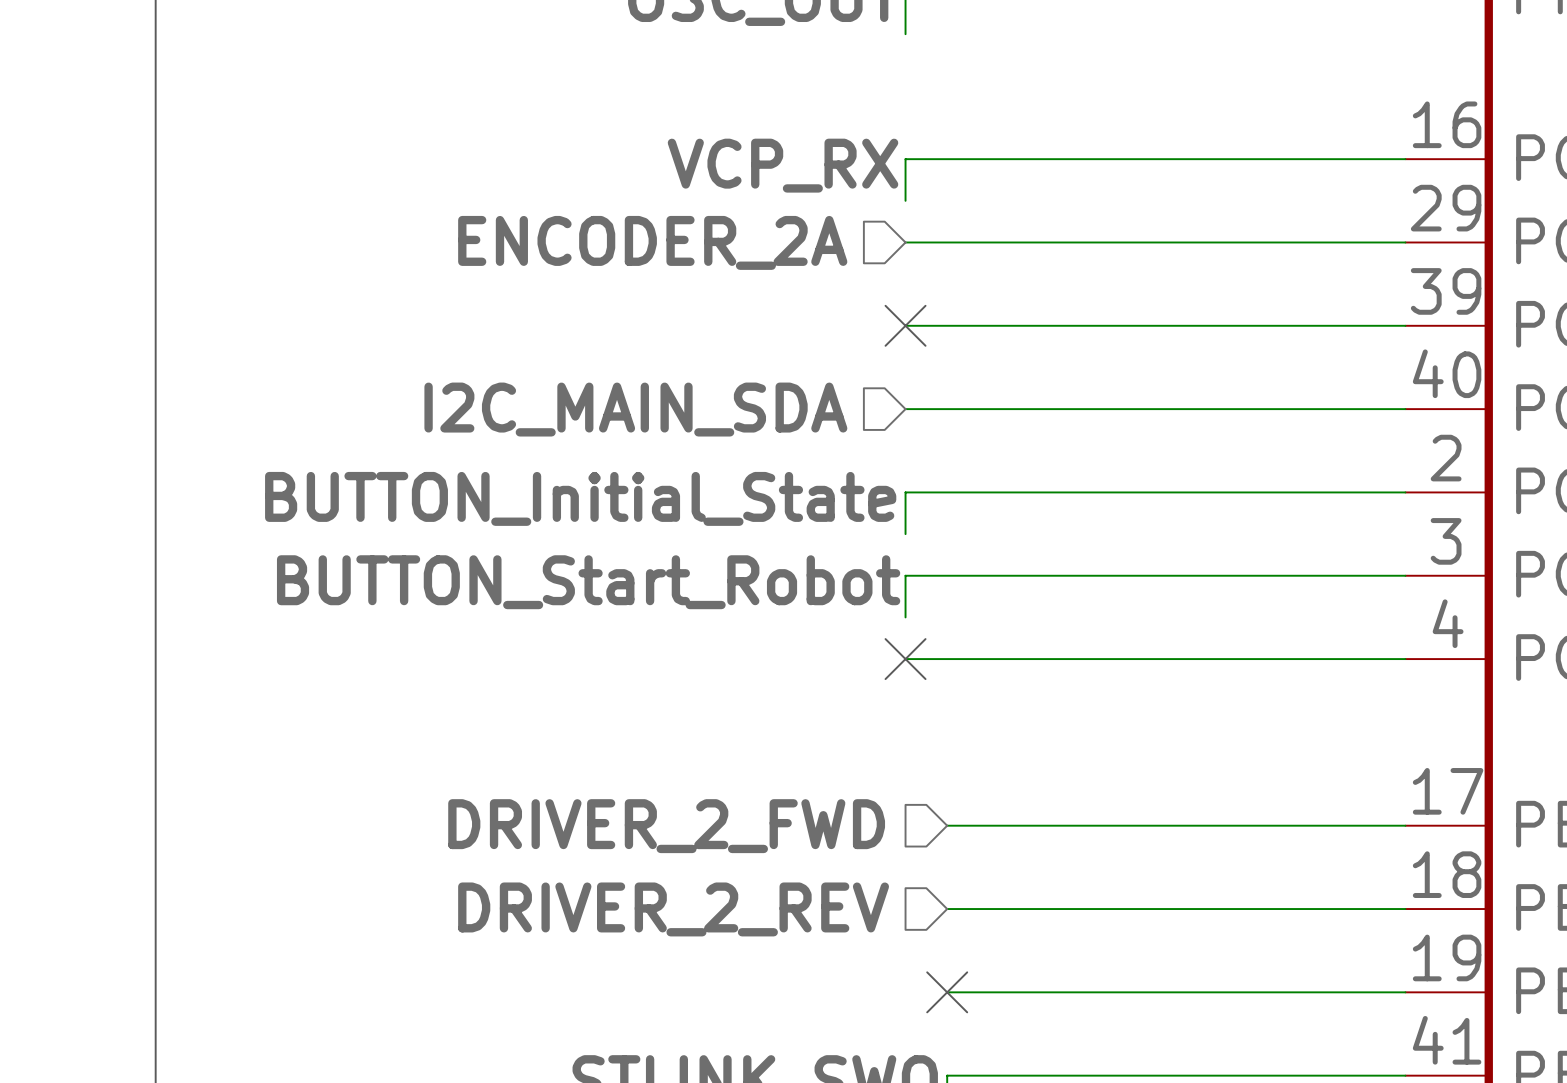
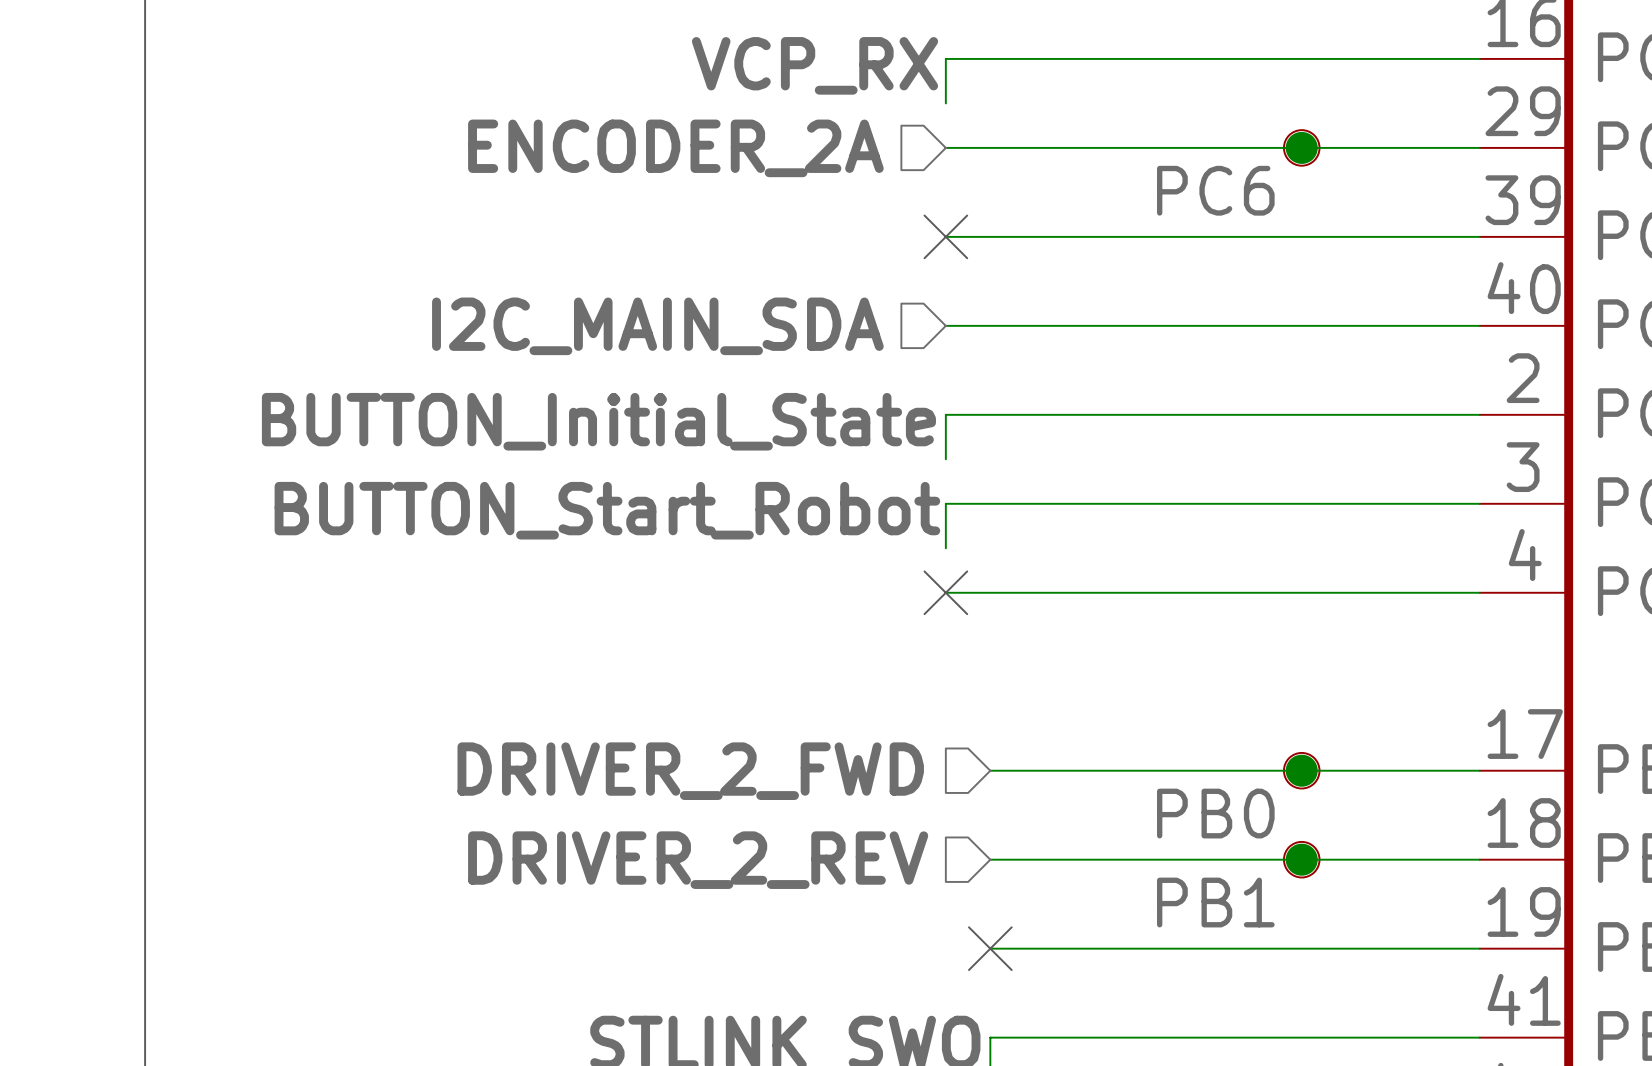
junction: none -> (1301, 147)
part: none -> PC6 (1301, 147)
junction: none -> (1301, 770)
part: none -> PB0 (1301, 770)
junction: none -> (1301, 859)
part: none -> PB1 (1301, 859)

